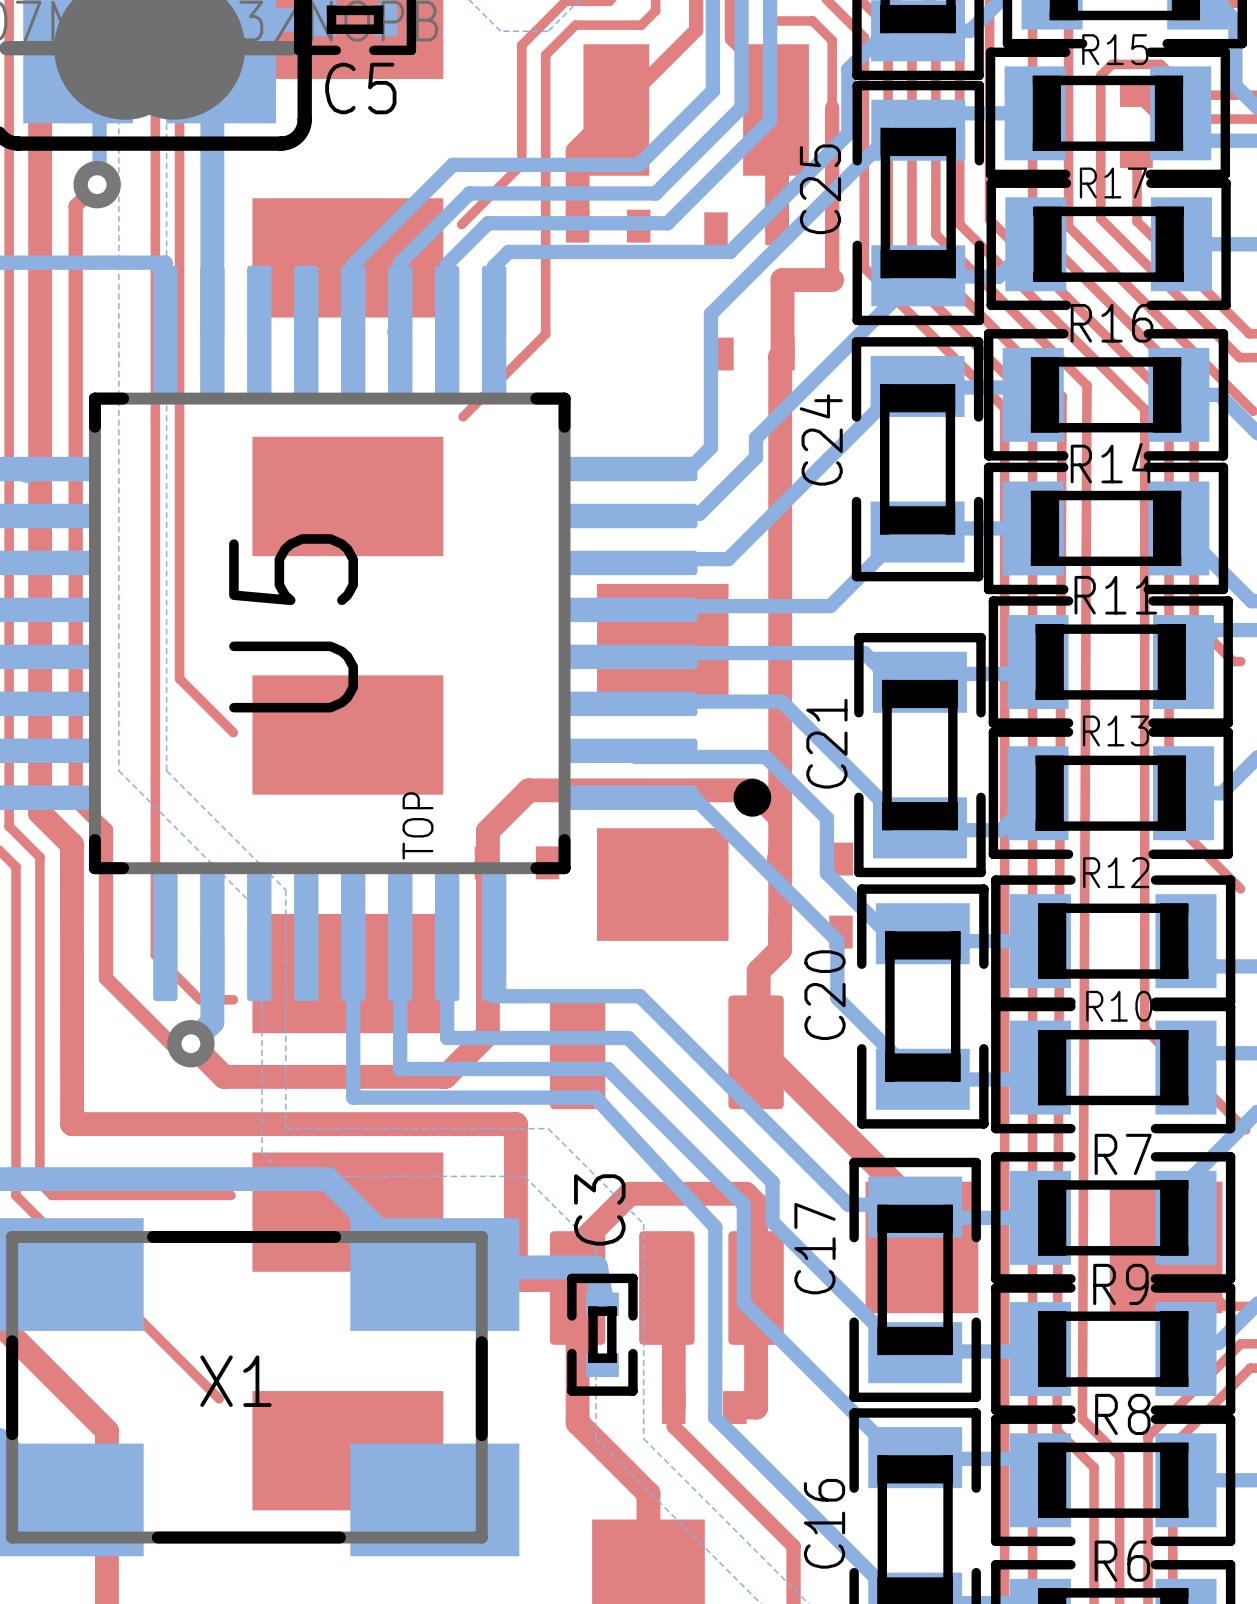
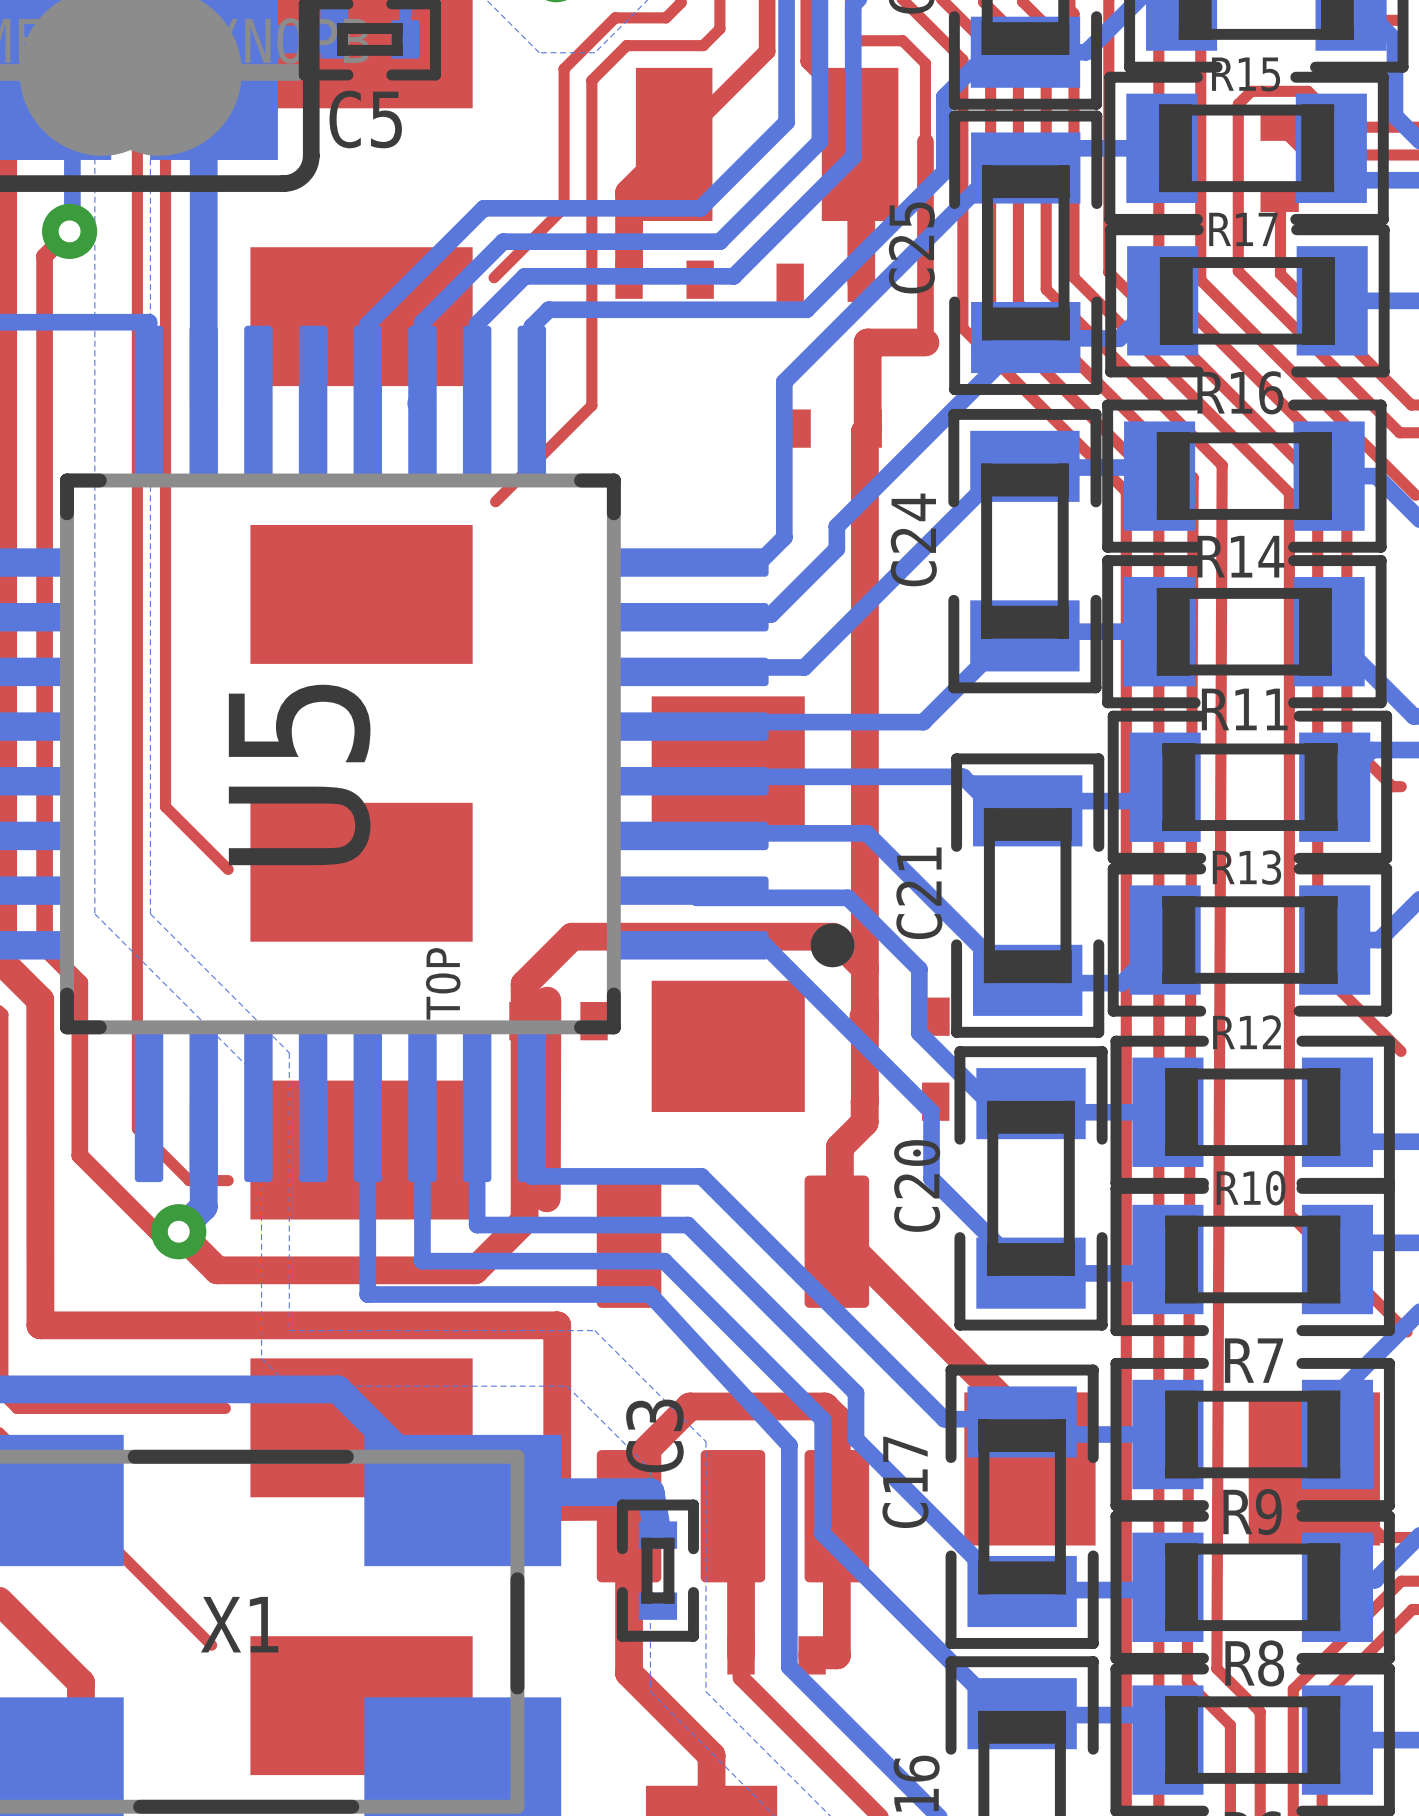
top track: none -> (547, 1000) (546, 1198)

